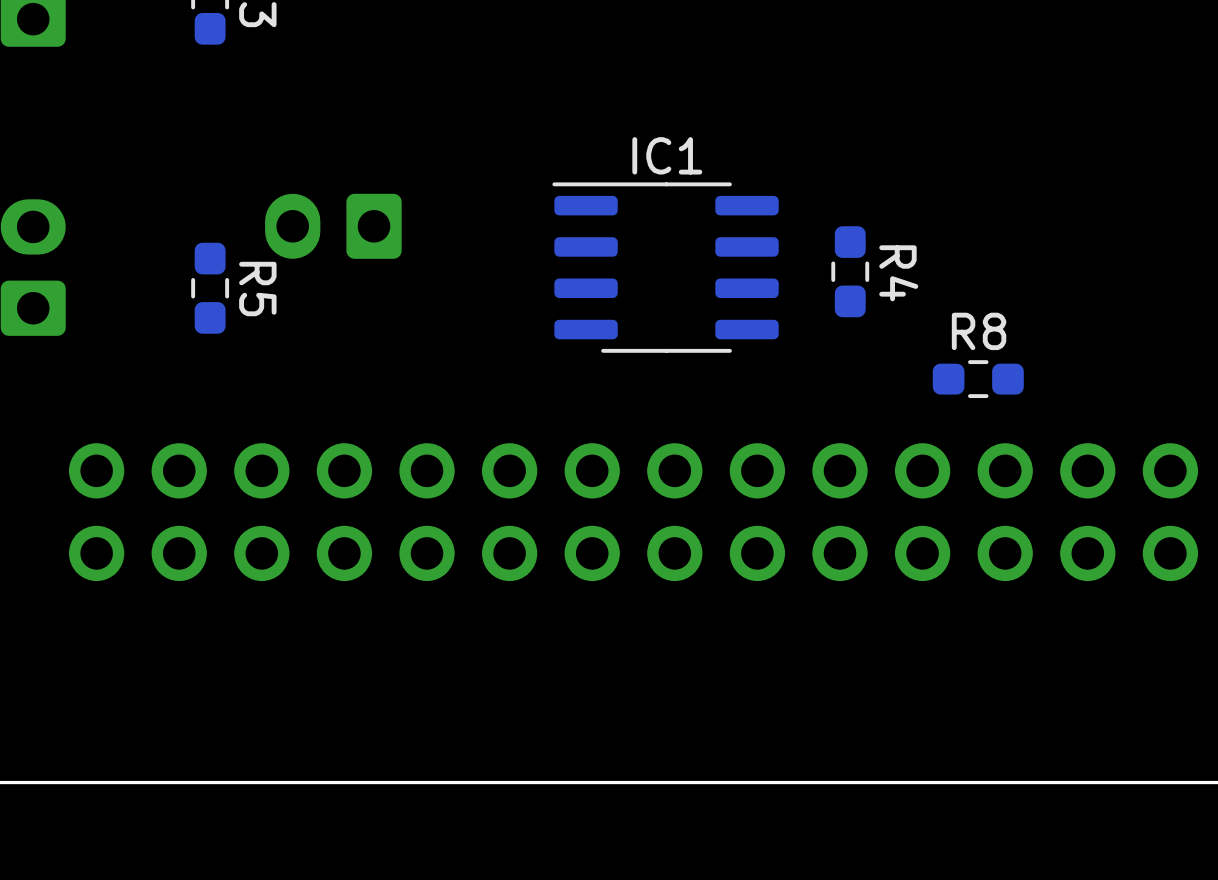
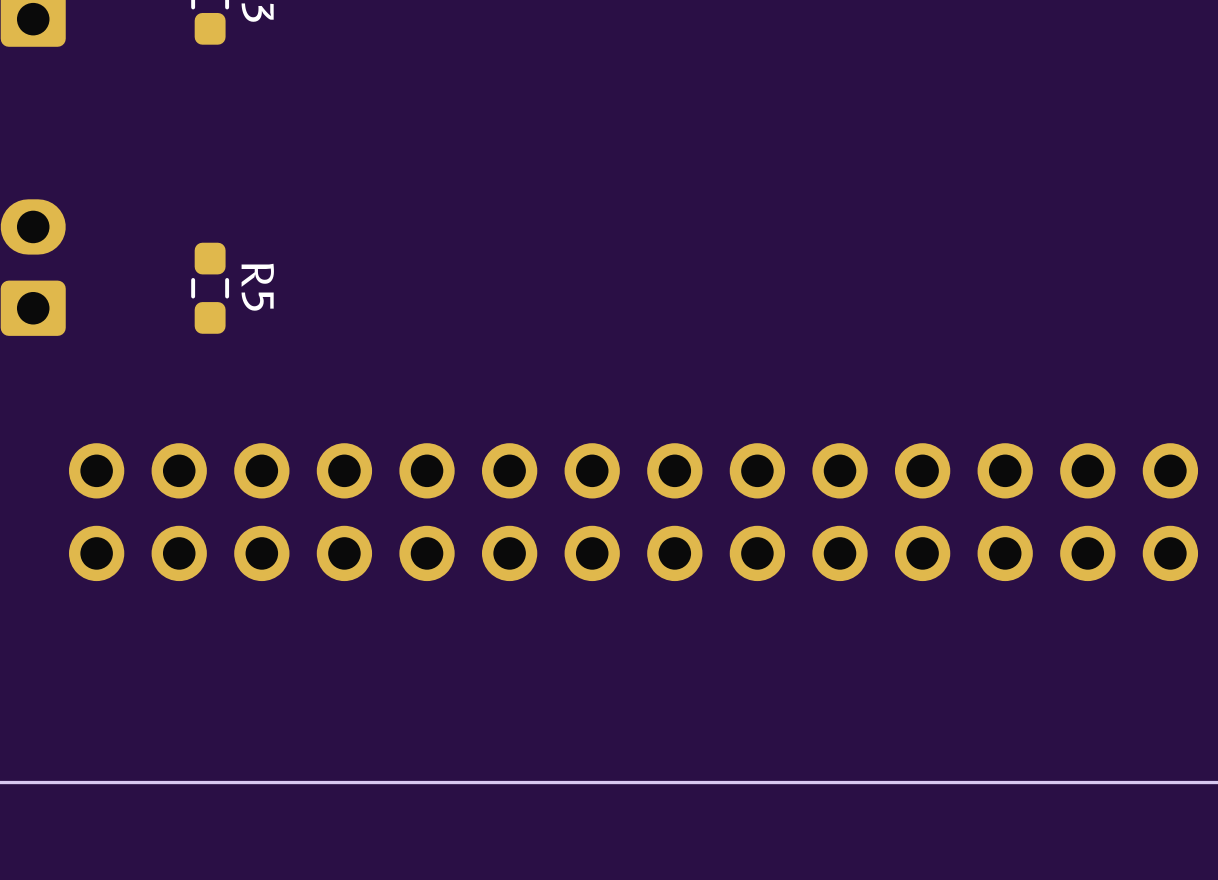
part: (333, 226) -> none
IC1: (665, 267) -> none
R4: (850, 271) -> none
R8: (978, 379) -> none

